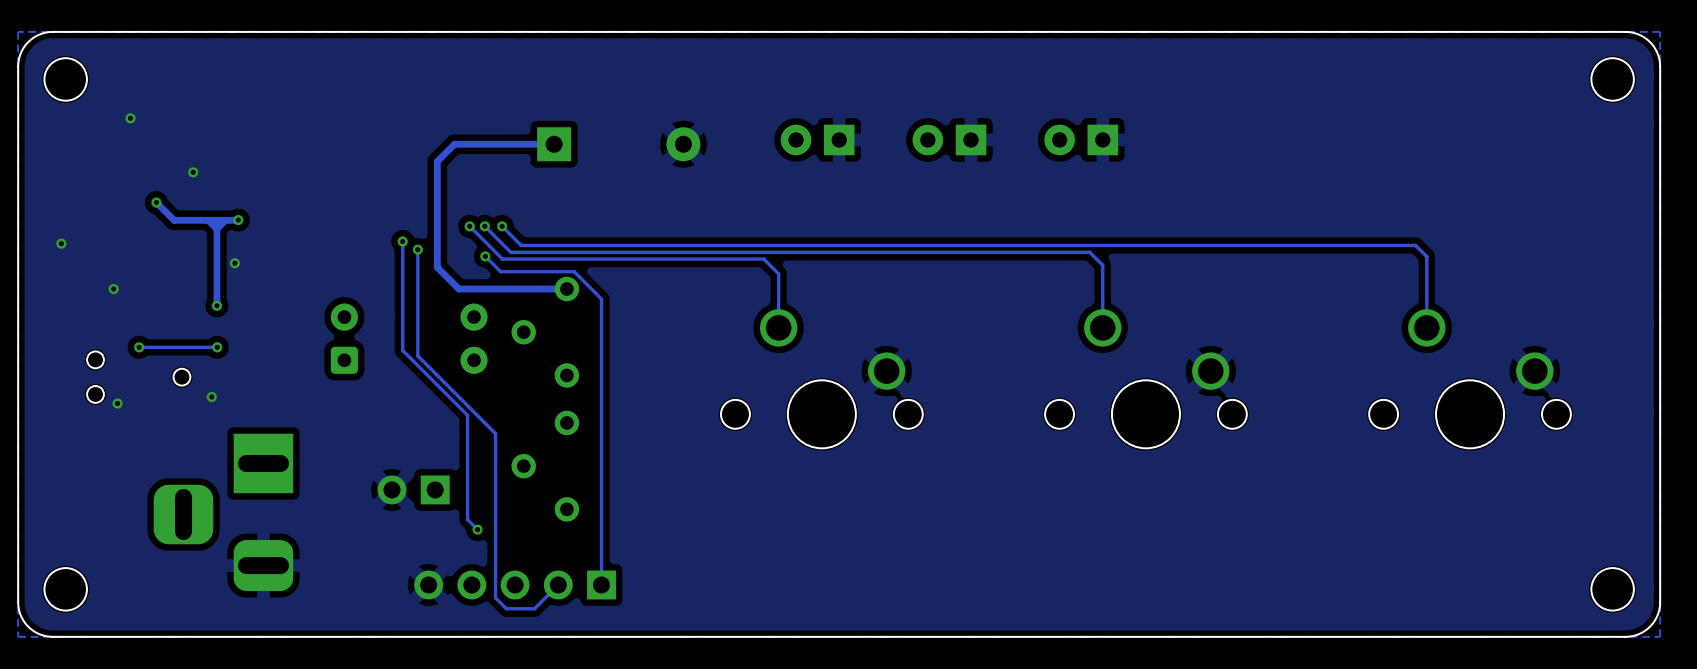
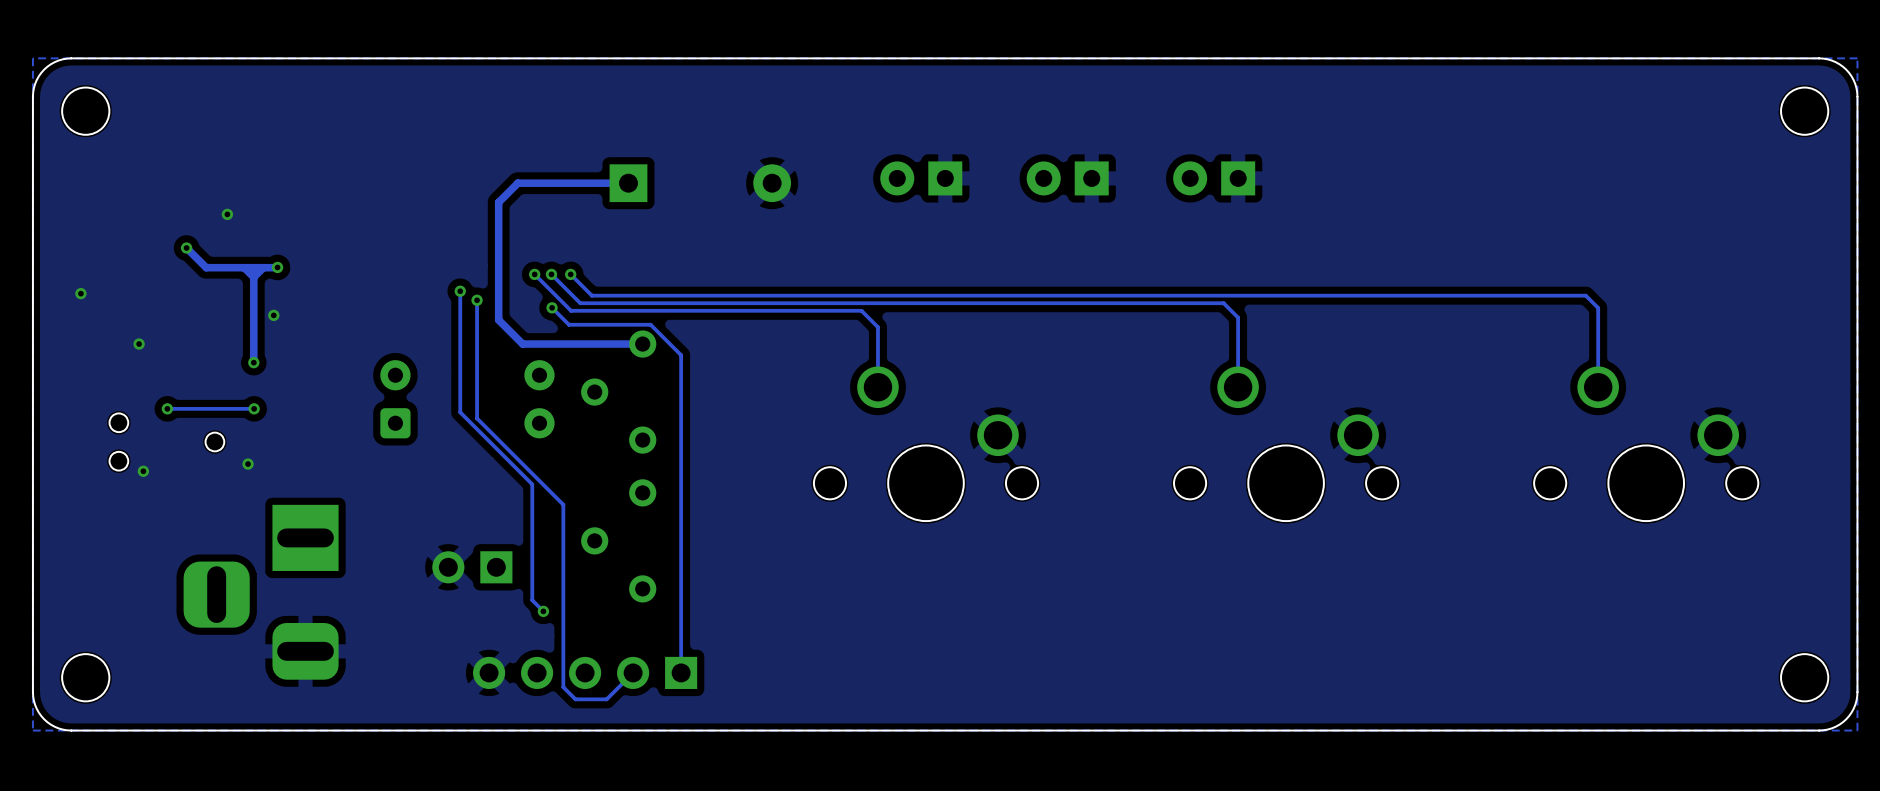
via: (130, 118) -> none

